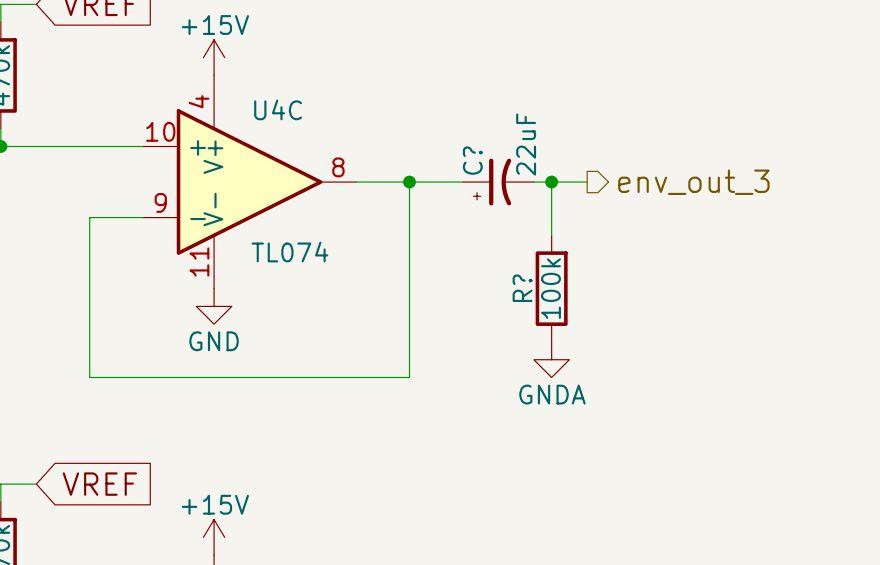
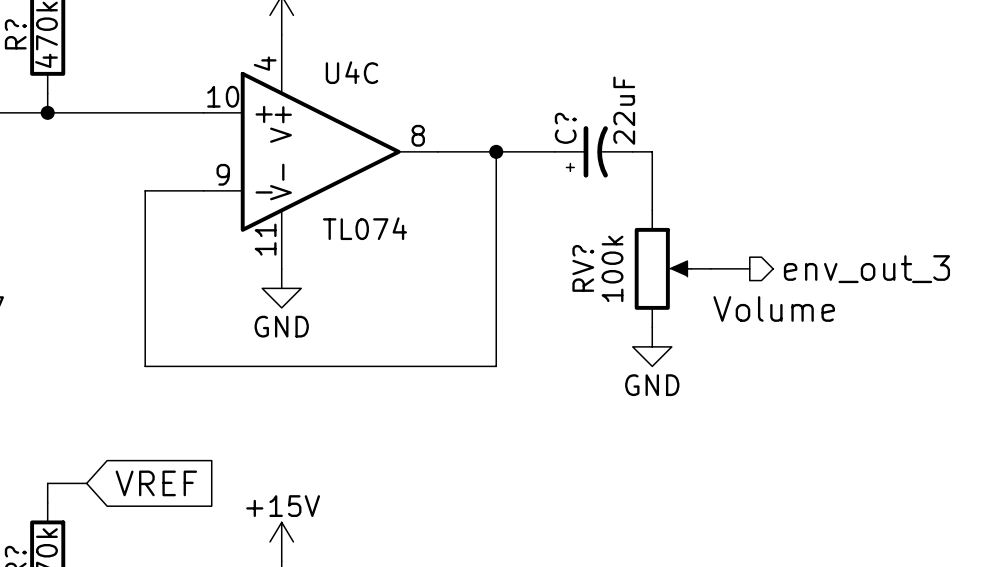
wire: (551, 182) (587, 182) -> (710, 268) (749, 268)
junction: (551, 182) -> none
hierarchical label position: env_out_3 (693, 182) -> env_out_3 (866, 269)
R?: 100k (551, 288) -> none
RV?: none -> 100k (672, 268)
text: none -> Volume (774, 308)
power symbol: GNDA (551, 359) -> GND (652, 346)

